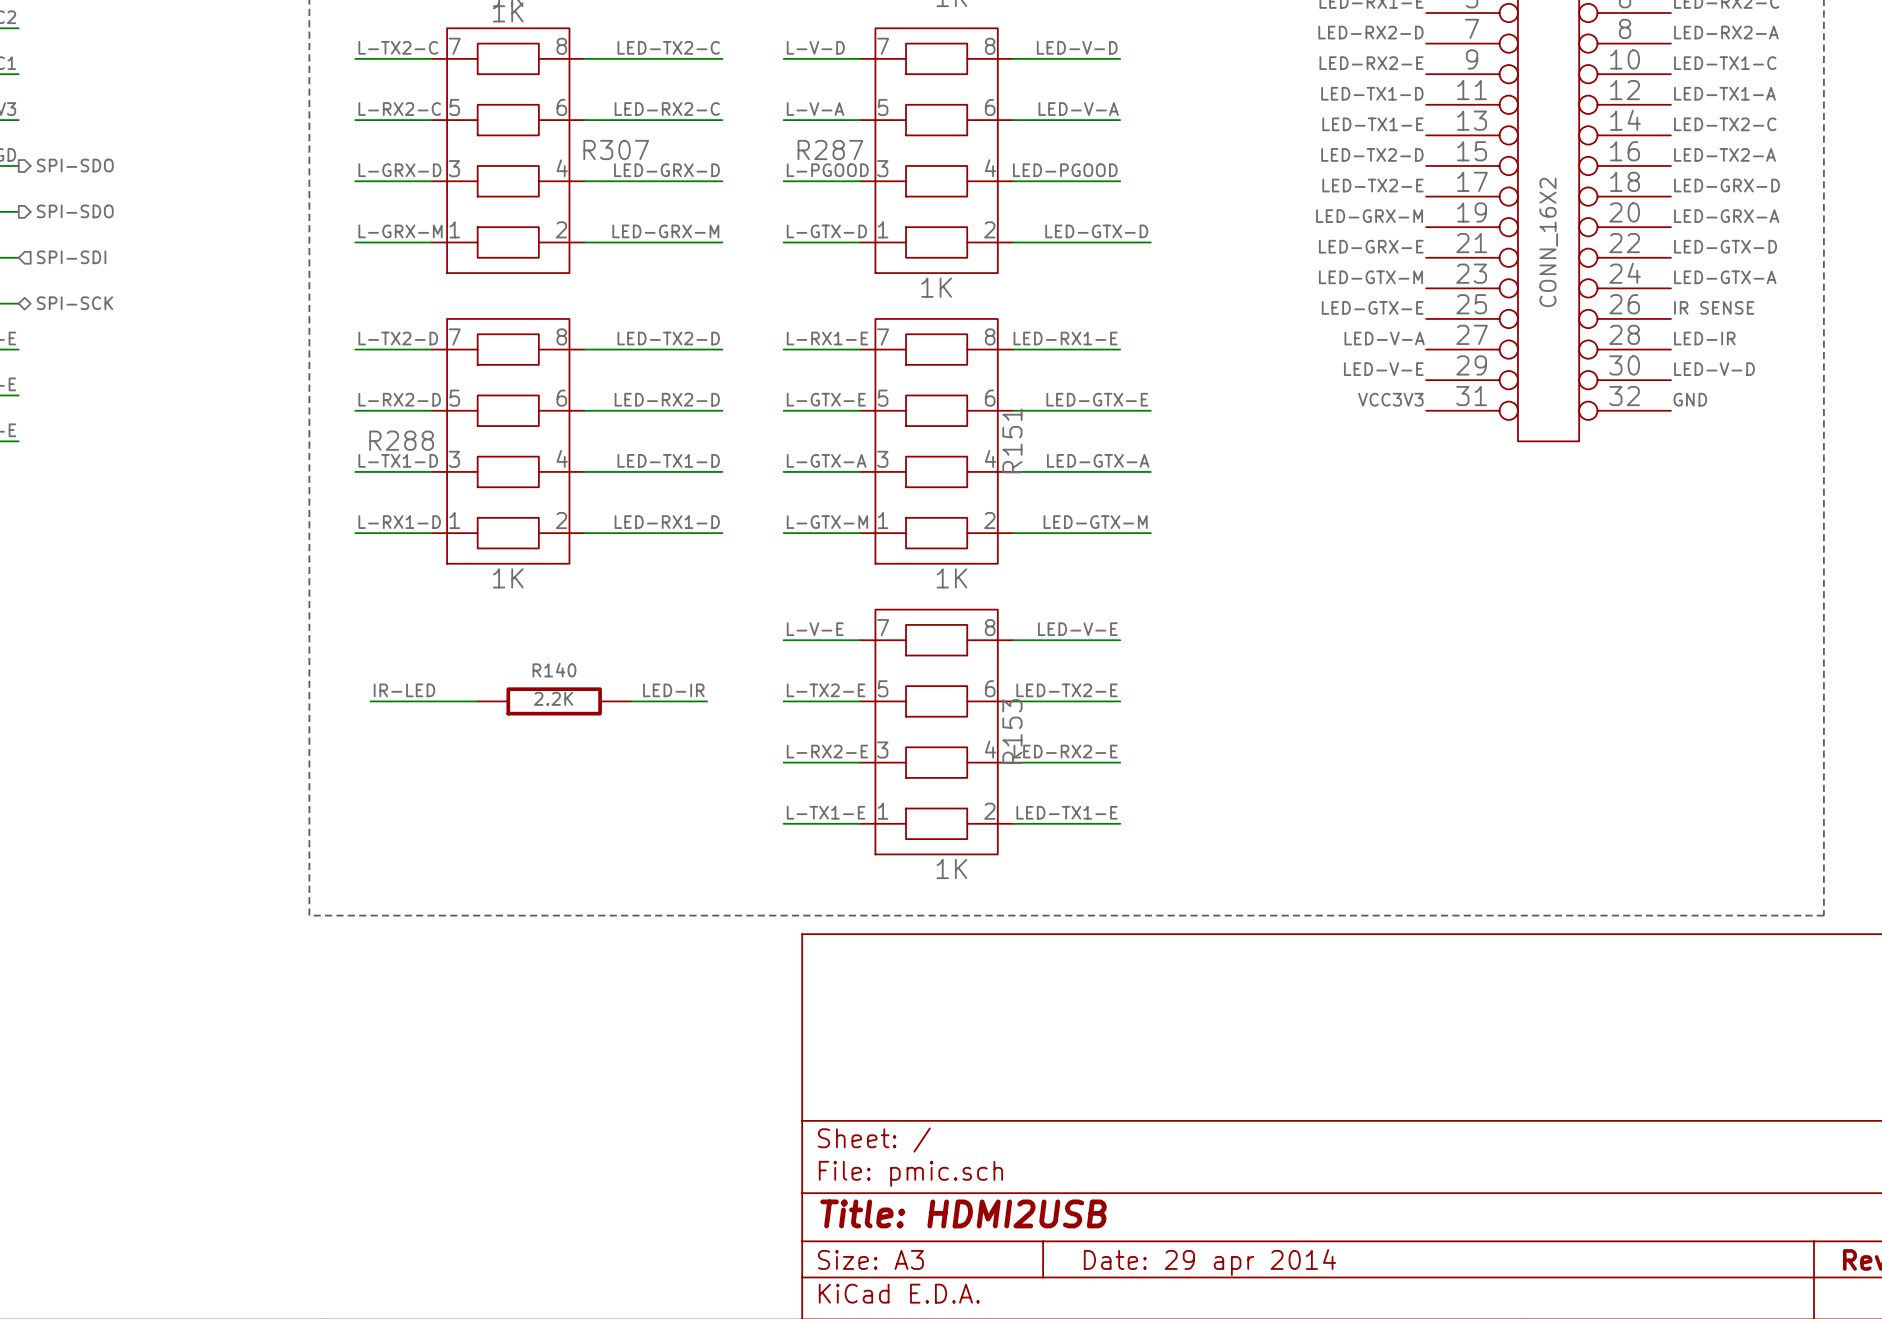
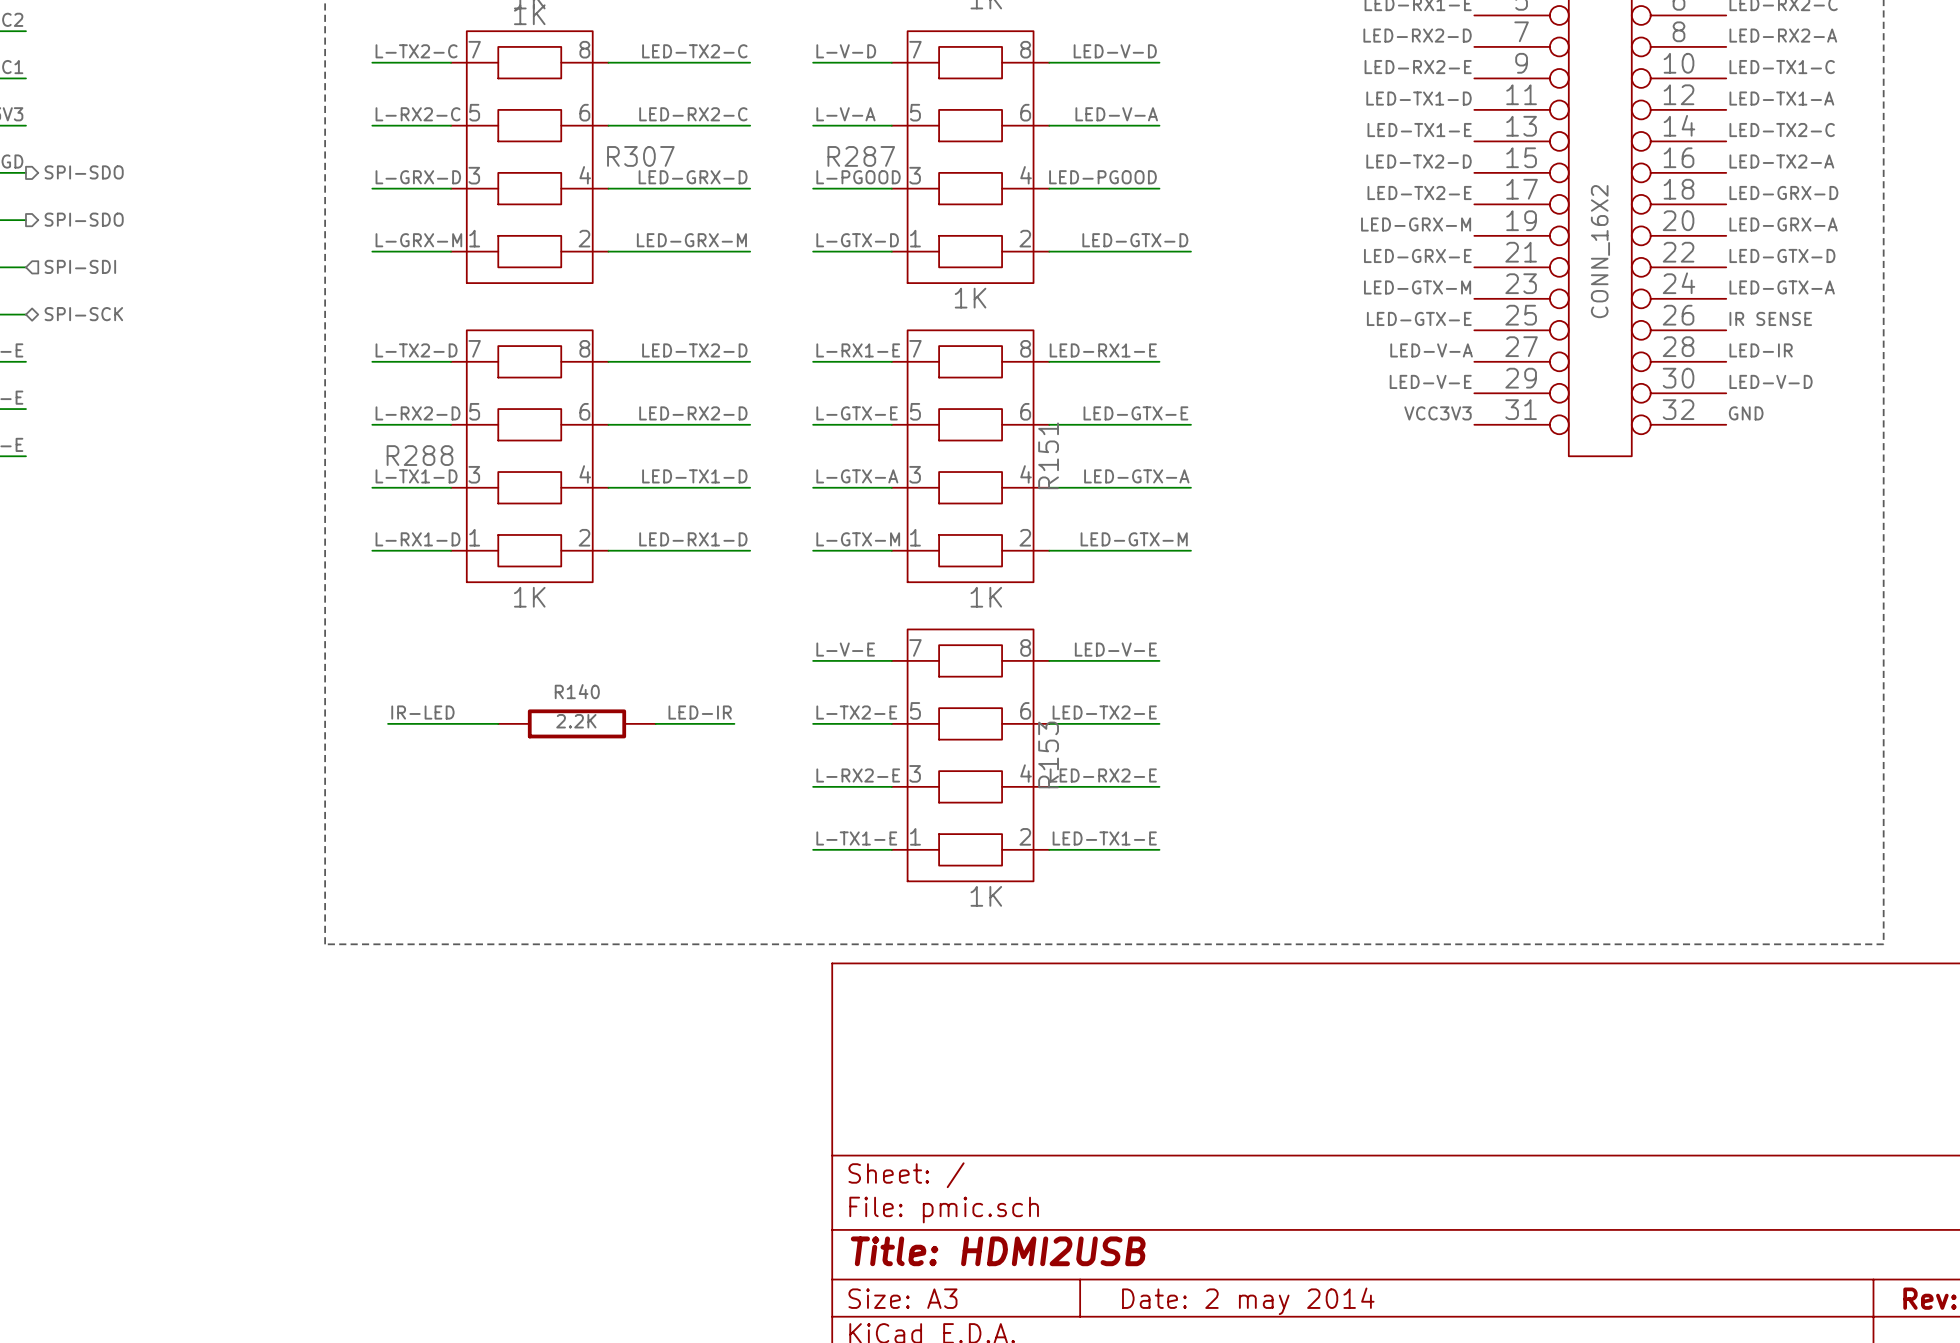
title block: Date: 29 apr 2014 (1209, 1262) -> Date: 2 may 2014 (1248, 1301)

